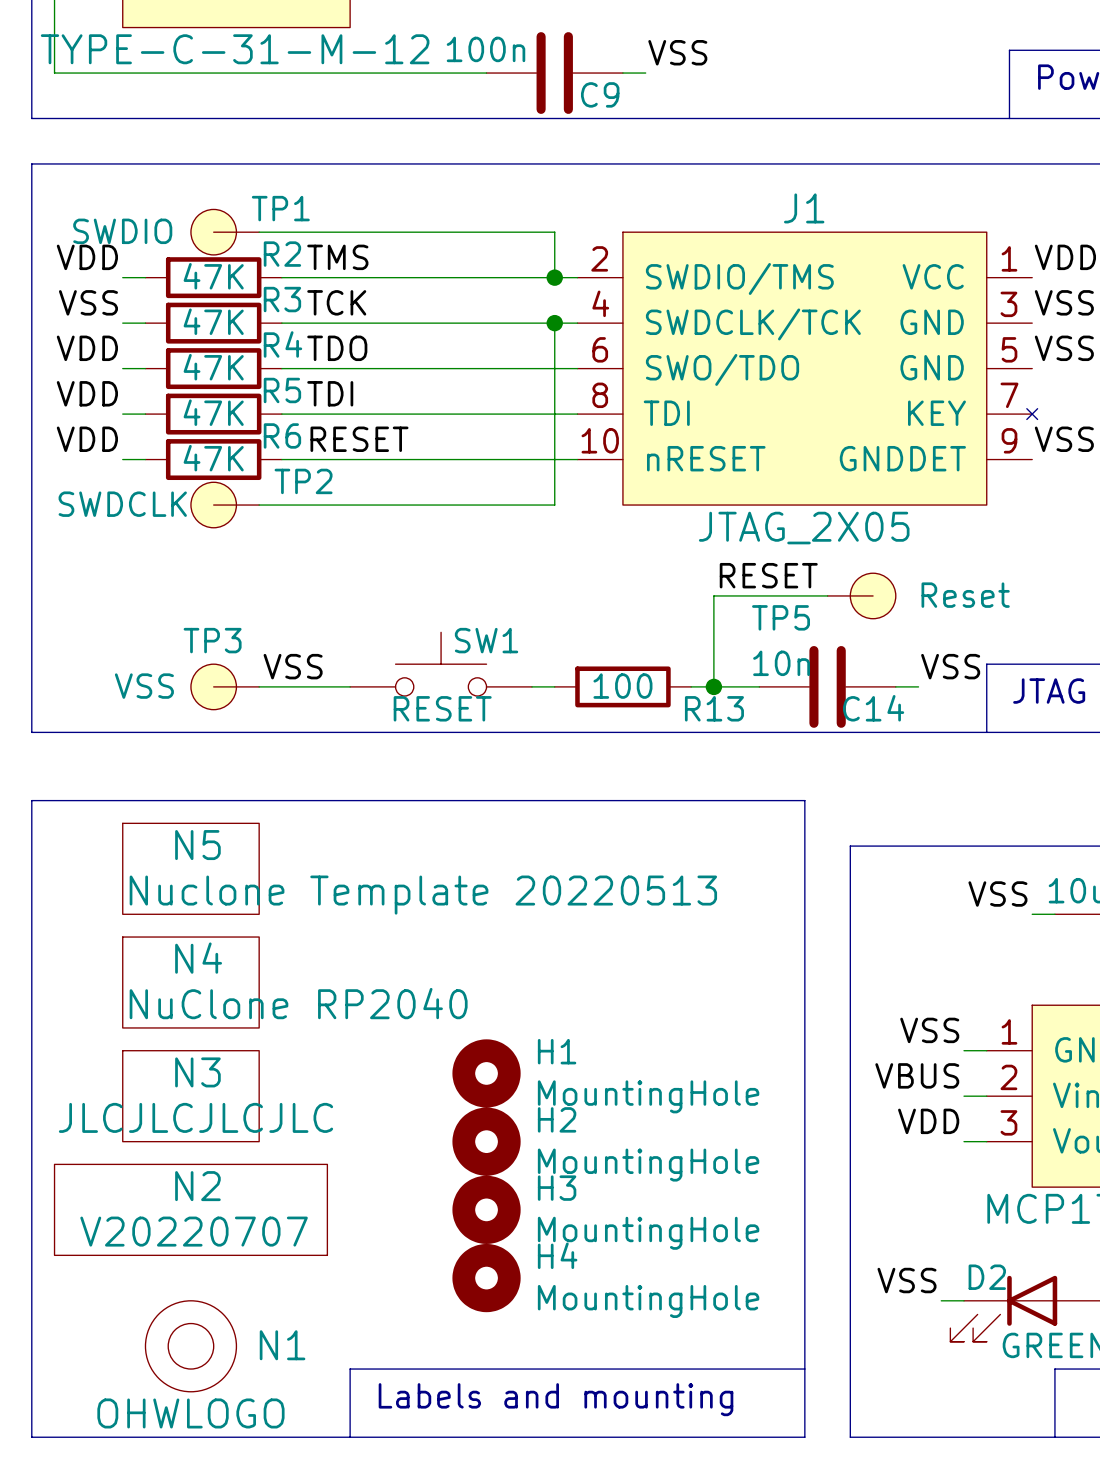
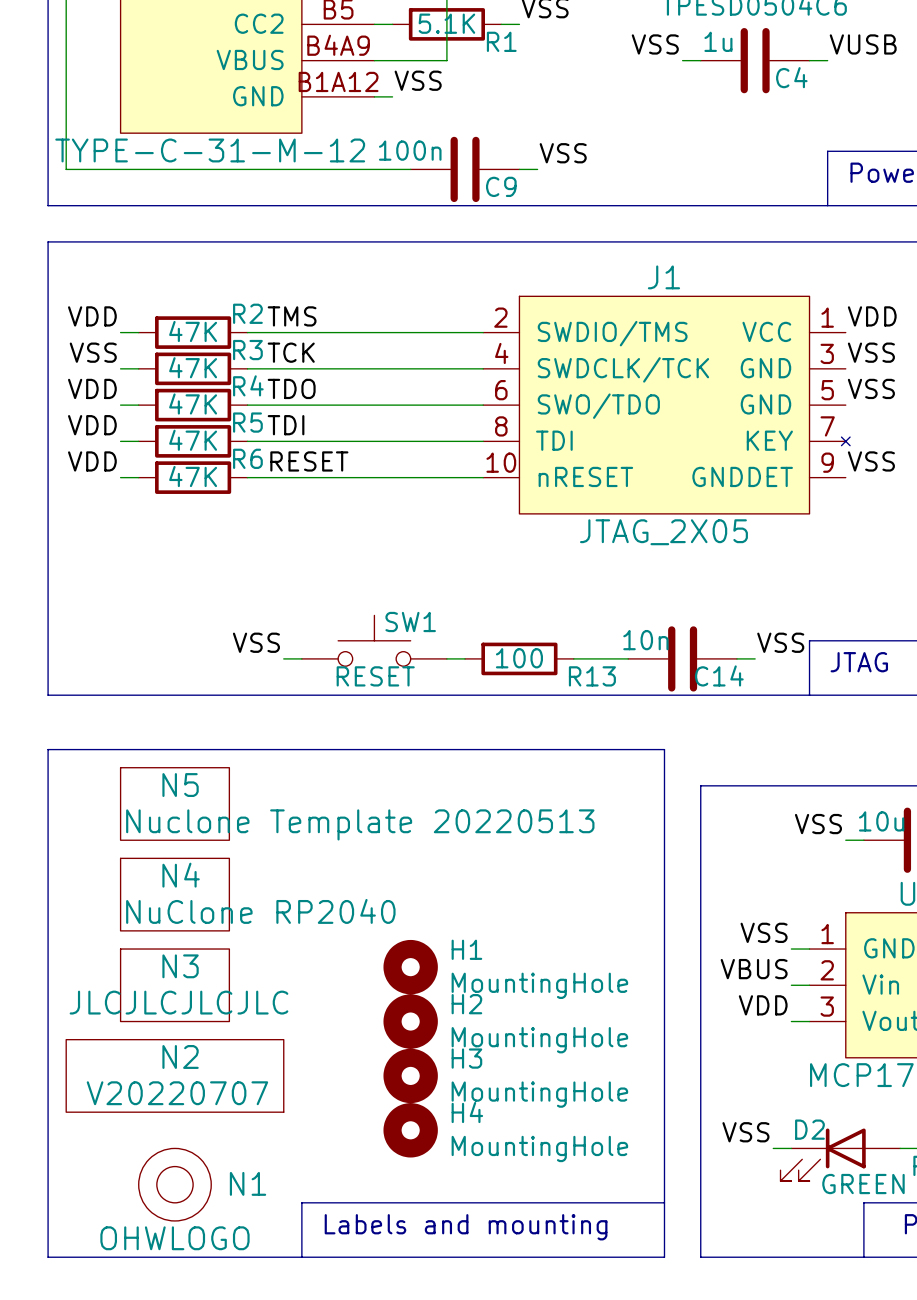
TP1: SWDIO (225, 232) -> none
wire: (259, 232) (554, 232) (554, 277) -> none
junction: (554, 277) -> none
wire: (554, 323) (554, 505) (259, 505) -> none
junction: (554, 323) -> none
TP2: SWDCLK (225, 505) -> none
label: RESET (768, 575) -> none
wire: (827, 595) (713, 595) (713, 686) -> none
TP5: Reset (861, 595) -> none
TP3: VSS (225, 686) -> none
wire: (259, 686) (327, 686) -> none
junction: (713, 686) -> none

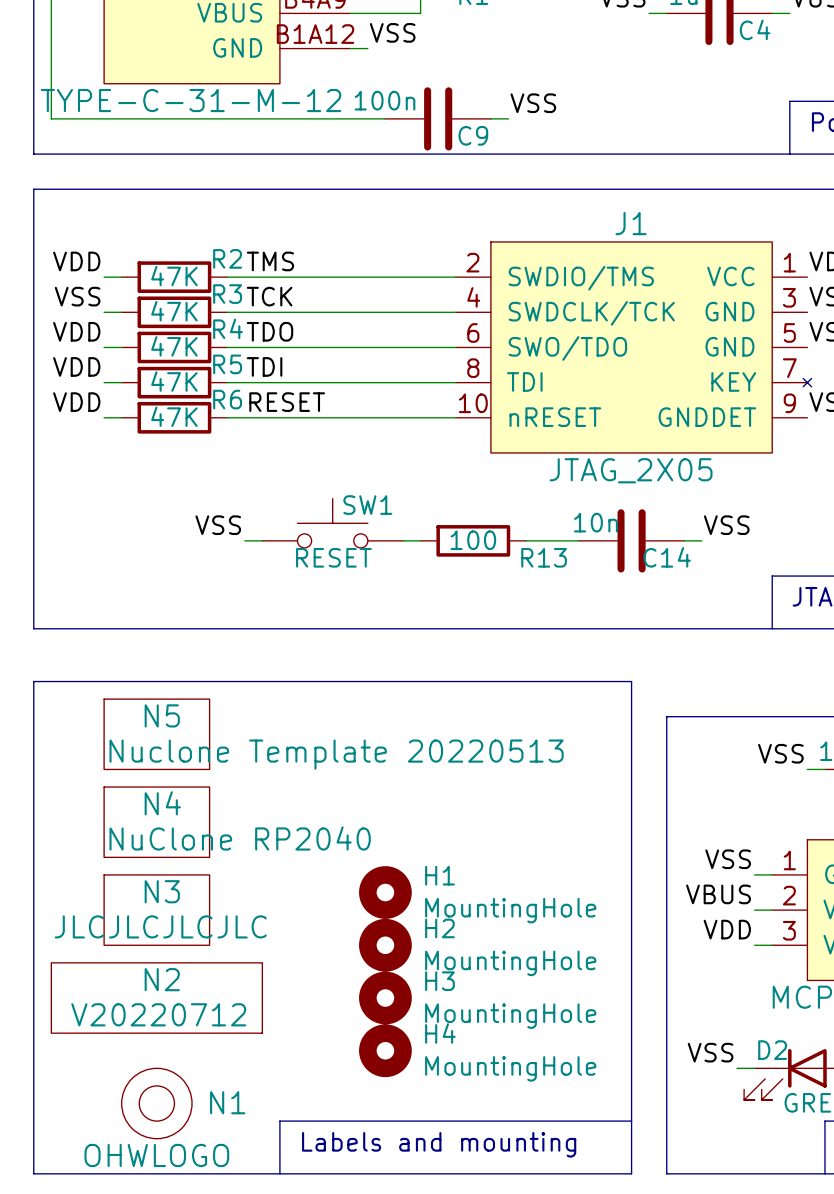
SW1 position: (374, 640) -> (332, 523)
label position: VSS (256, 642) -> VSS (218, 525)
label position: VSS (780, 642) -> VSS (726, 525)
wire: (283, 658) (301, 658) -> (244, 540) (262, 540)
wire: (446, 658) (465, 658) -> (403, 540) (420, 540)
R13 position: (519, 658) -> (473, 540)
wire: (573, 658) (628, 658) -> (526, 540) (578, 540)
C14 position: (682, 658) -> (631, 540)
wire: (737, 658) (755, 658) -> (684, 540) (701, 540)
N2 value: V20220707 (177, 1093) -> V20220712 (158, 1014)

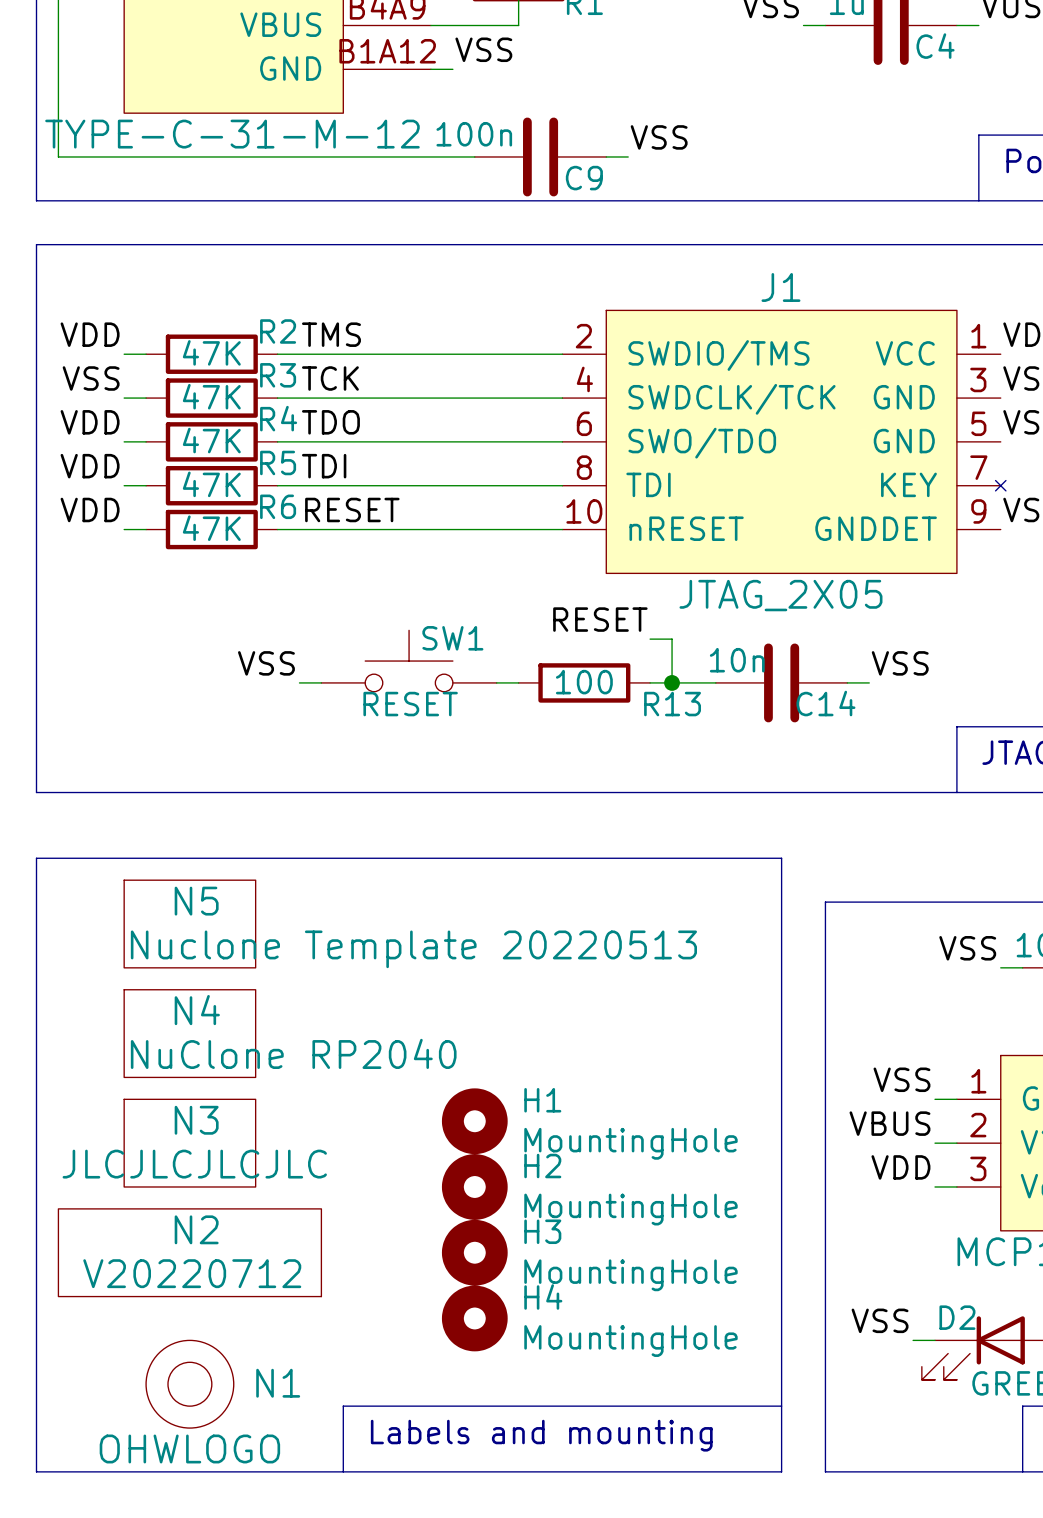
label: none -> RESET (600, 619)
wire: none -> (650, 639) (672, 639) (672, 682)
junction: none -> (672, 682)

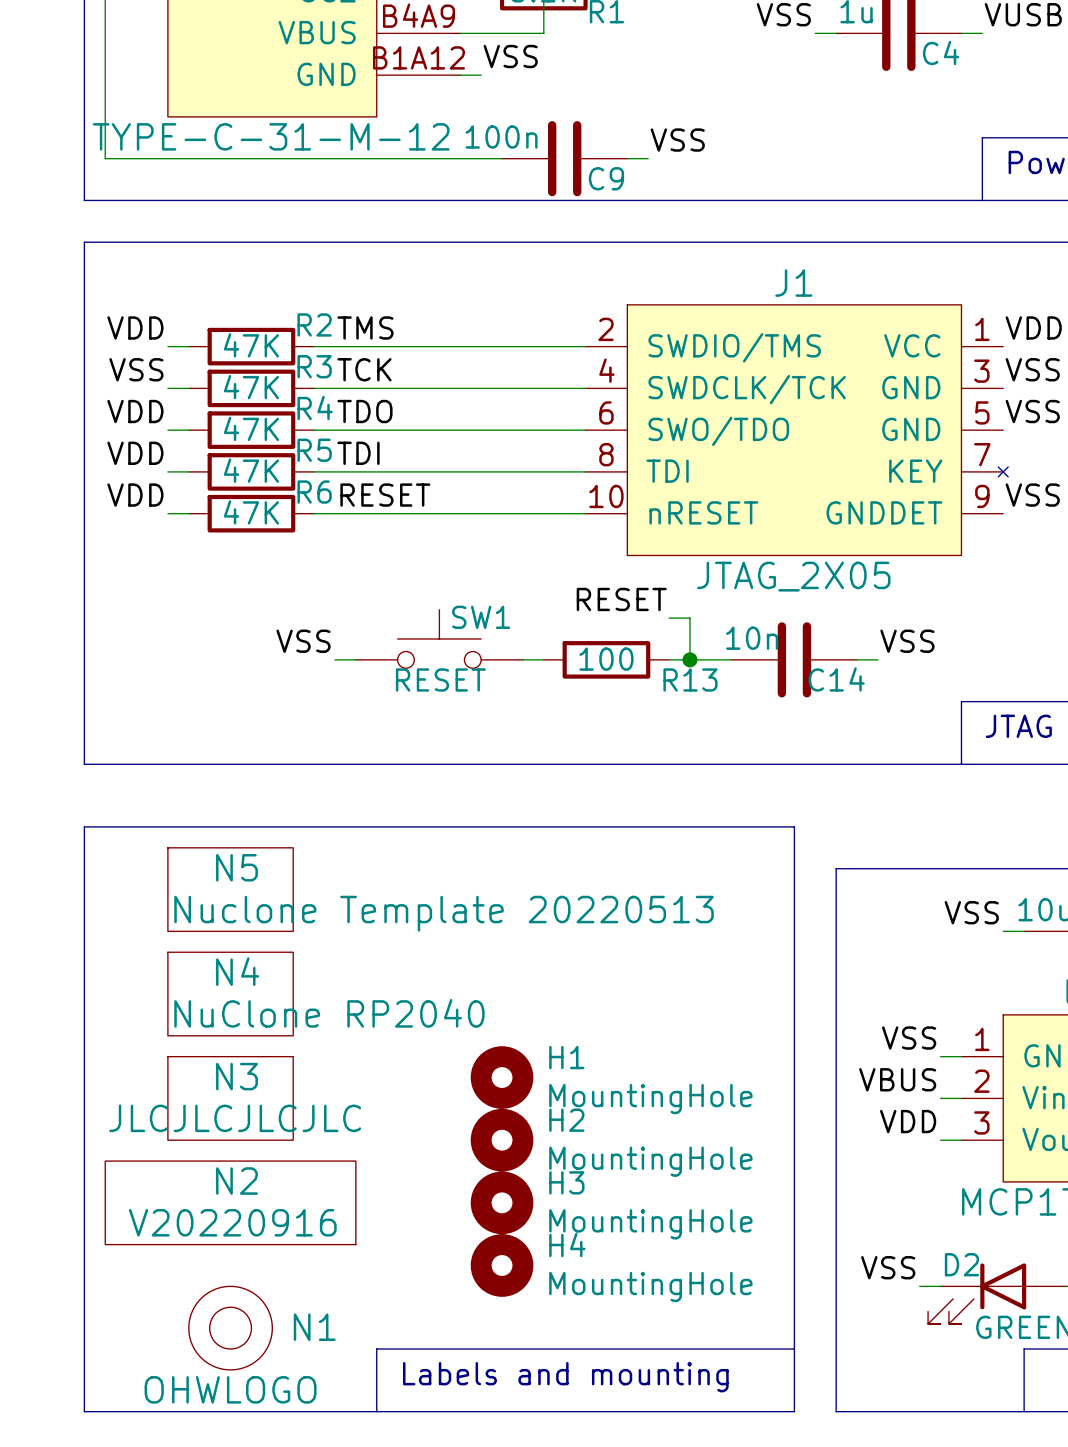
N2 value: V20220712 (192, 1273) -> V20220916 (232, 1222)

